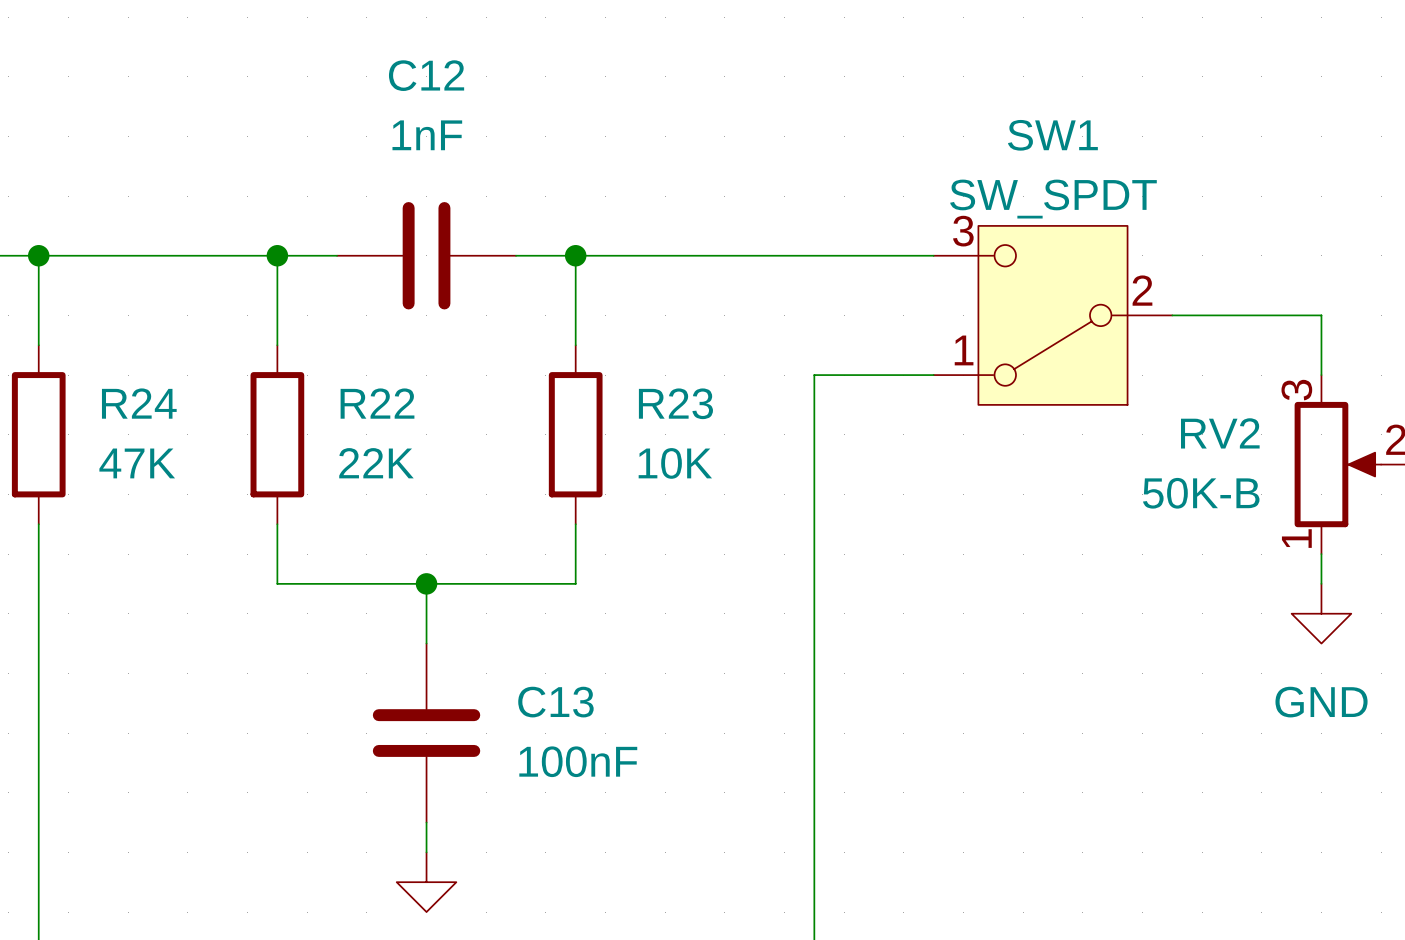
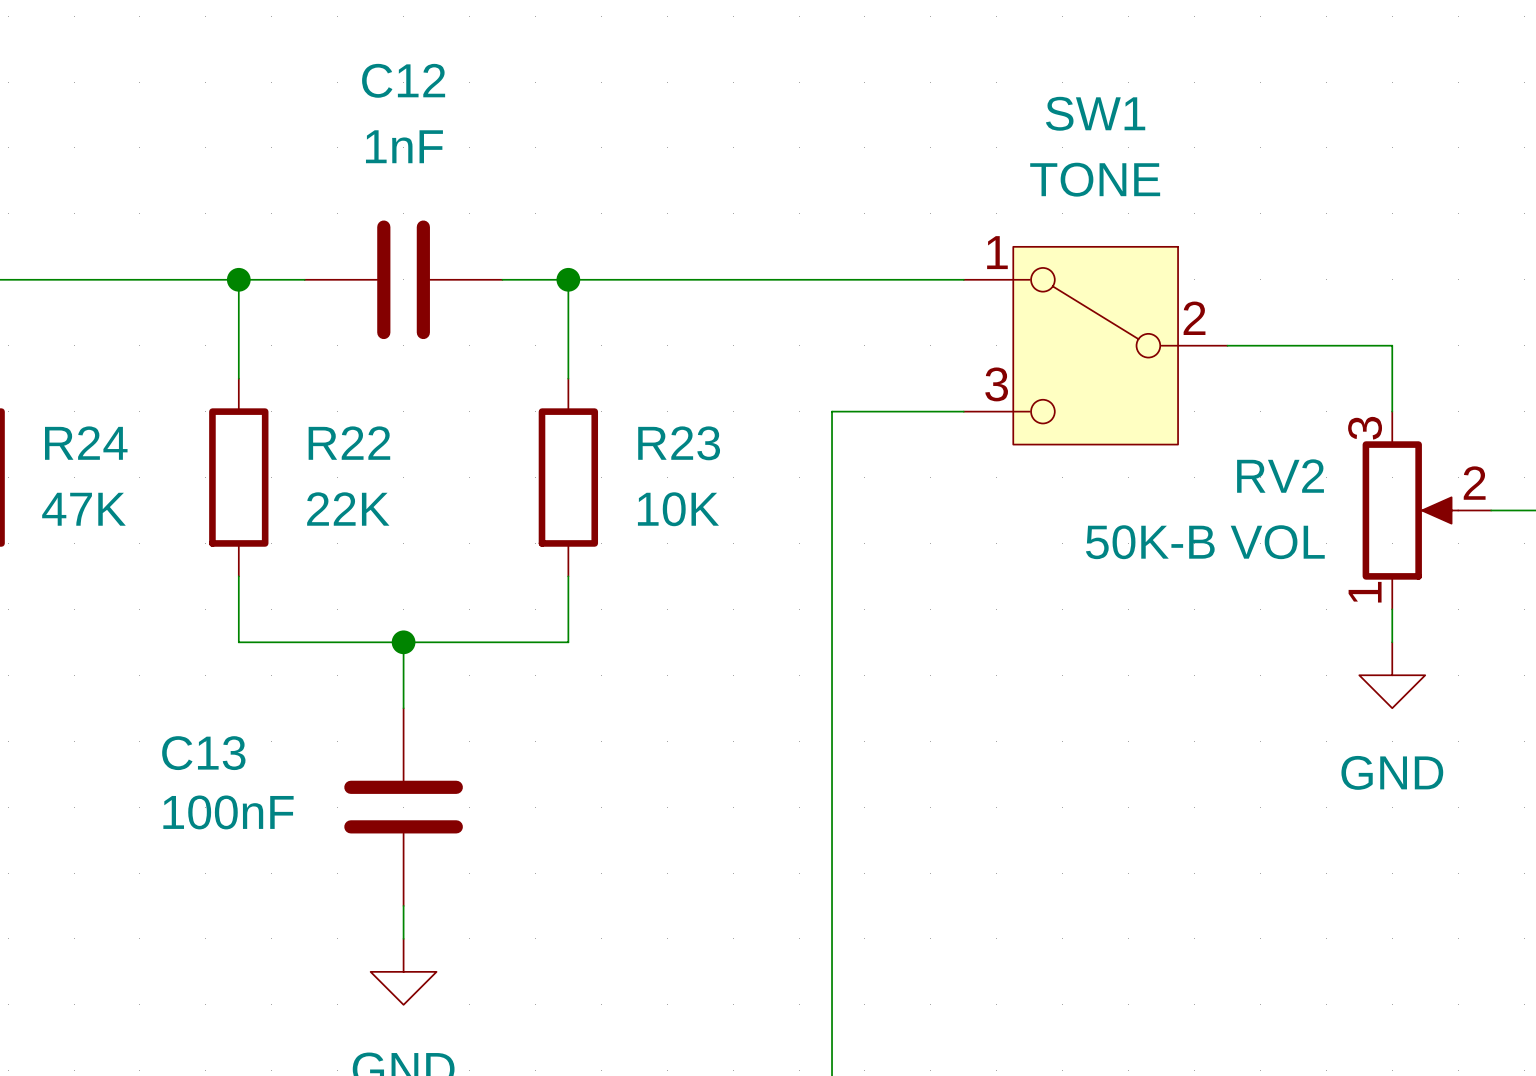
SW1 value: SW_SPDT (1053, 199) -> TONE (1095, 179)
SW1 flip: as is (1052, 315) -> up-down (1095, 345)
RV2 value: 50K-B (1201, 493) -> 50K-B VOL (1205, 542)
C13 name position: C13 (555, 702) -> C13 (203, 753)
C13 value position: 100nF (578, 761) -> 100nF (228, 812)

